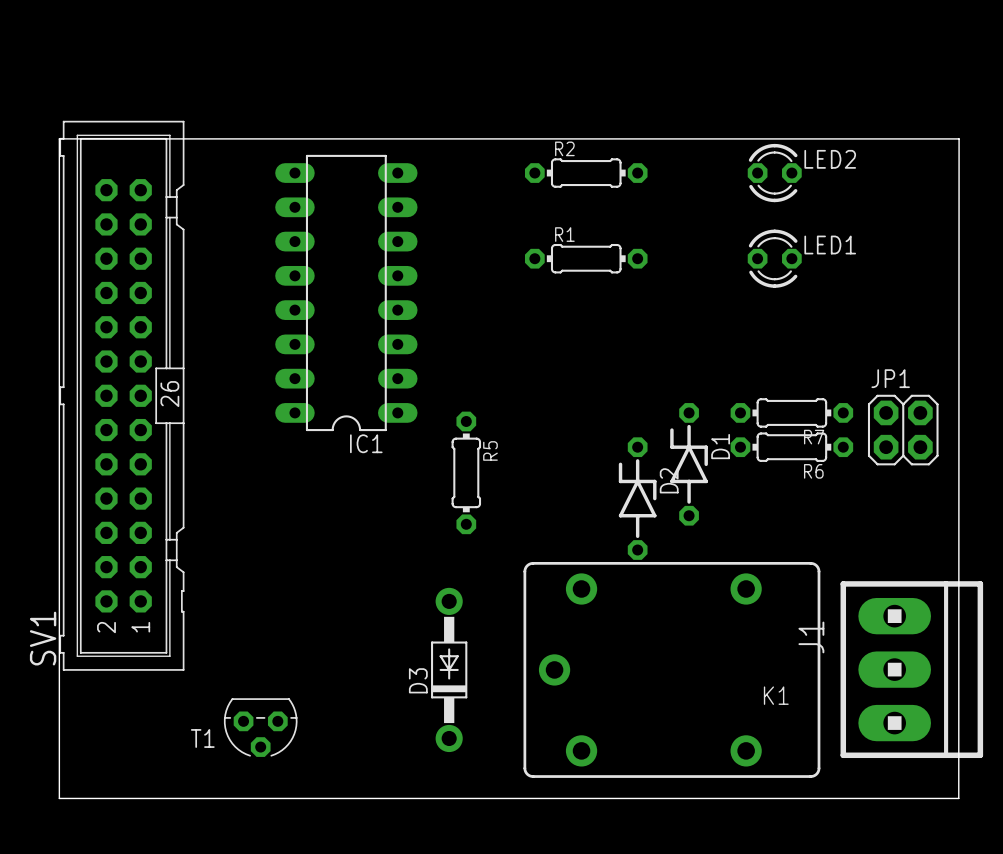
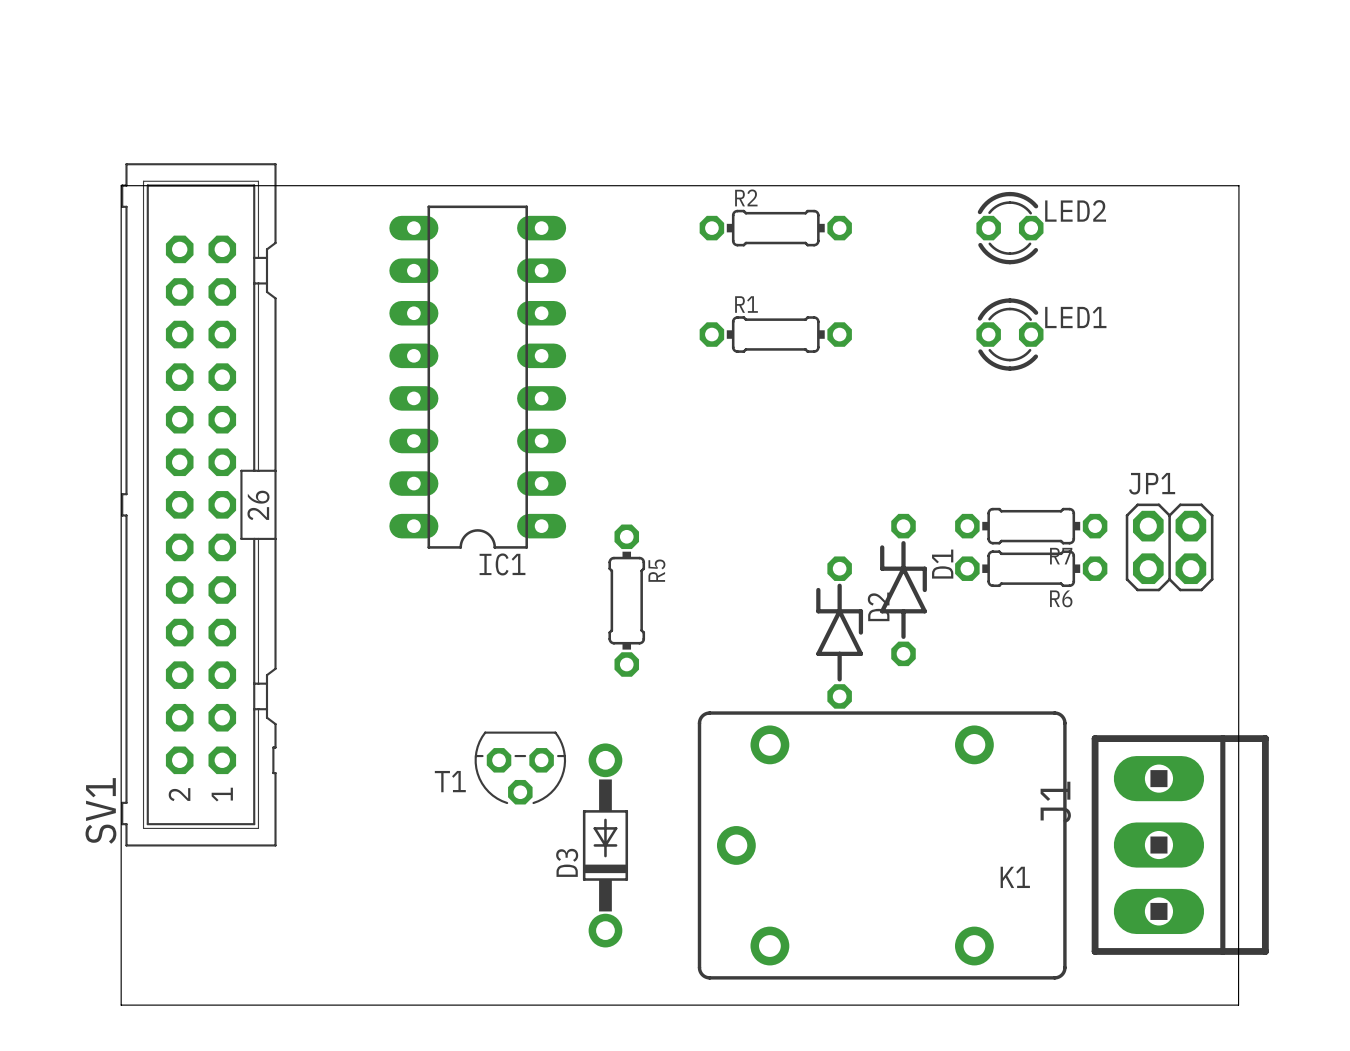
T1 position: (260, 727) -> (520, 768)

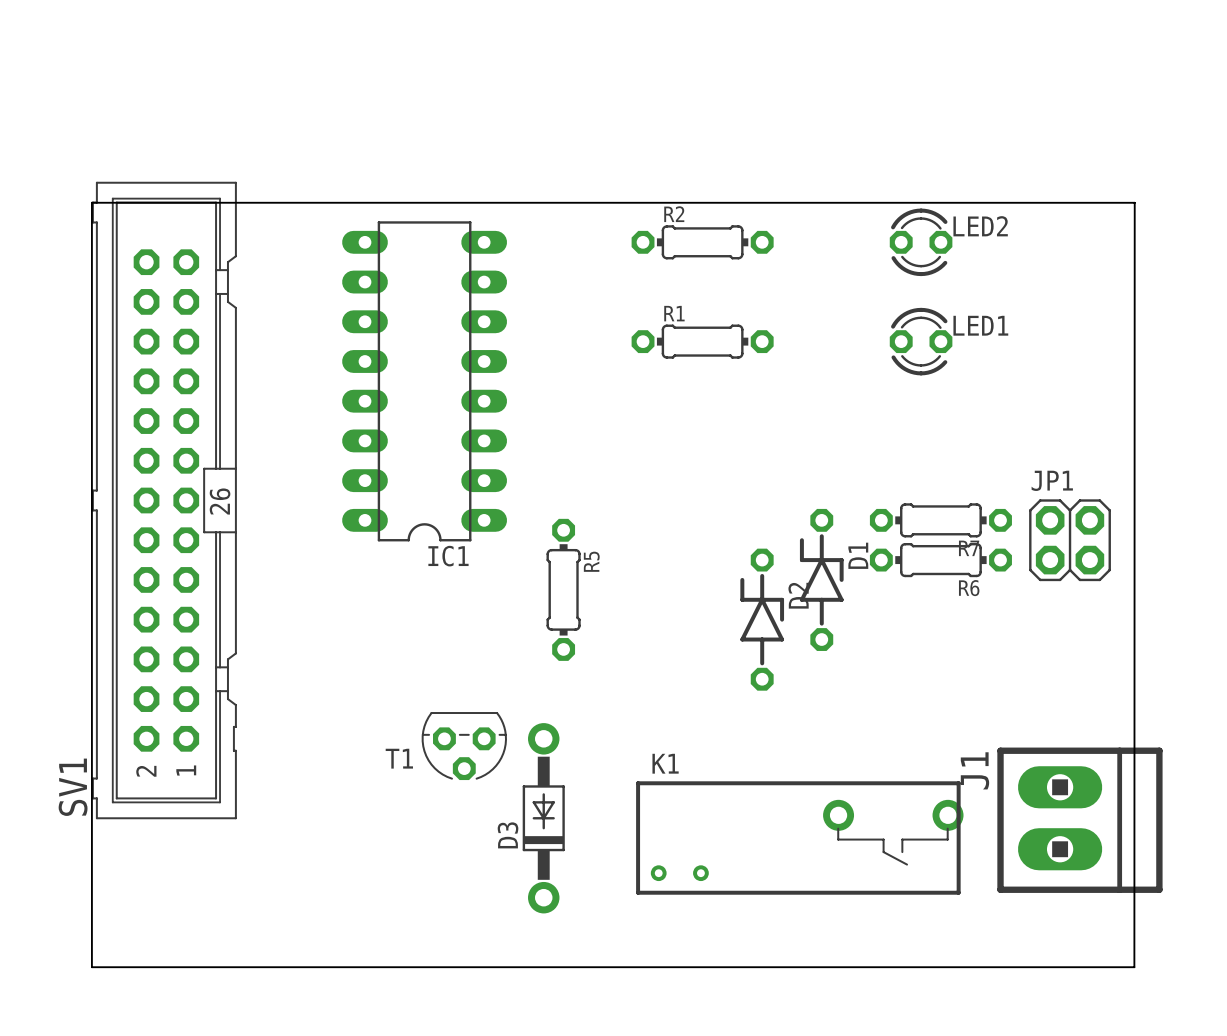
K1 footprint: [697, 711, 1067, 980] -> [636, 781, 964, 895]
J1 footprint: [1091, 735, 1269, 955] -> [997, 747, 1163, 893]
K1 name position: K1 (1015, 877) -> K1 (665, 763)

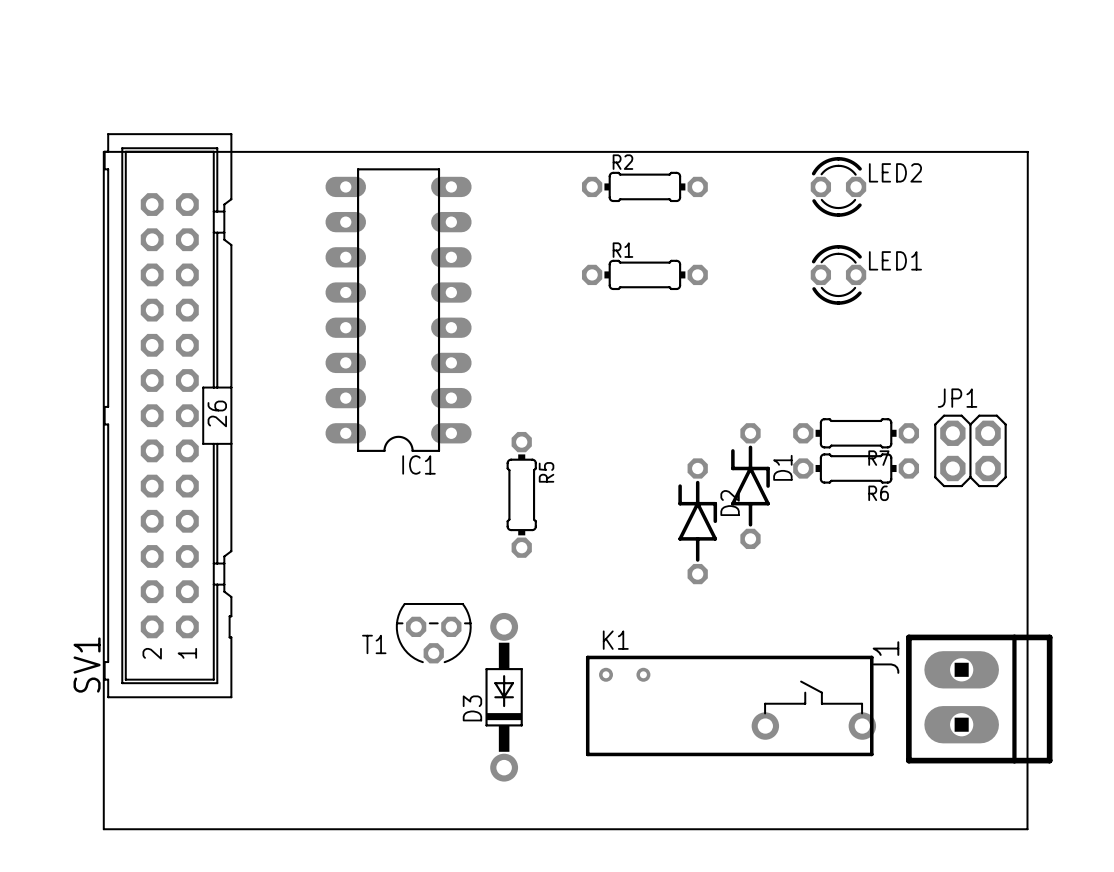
K1 footprint: [636, 781, 964, 895] -> [585, 655, 877, 757]

